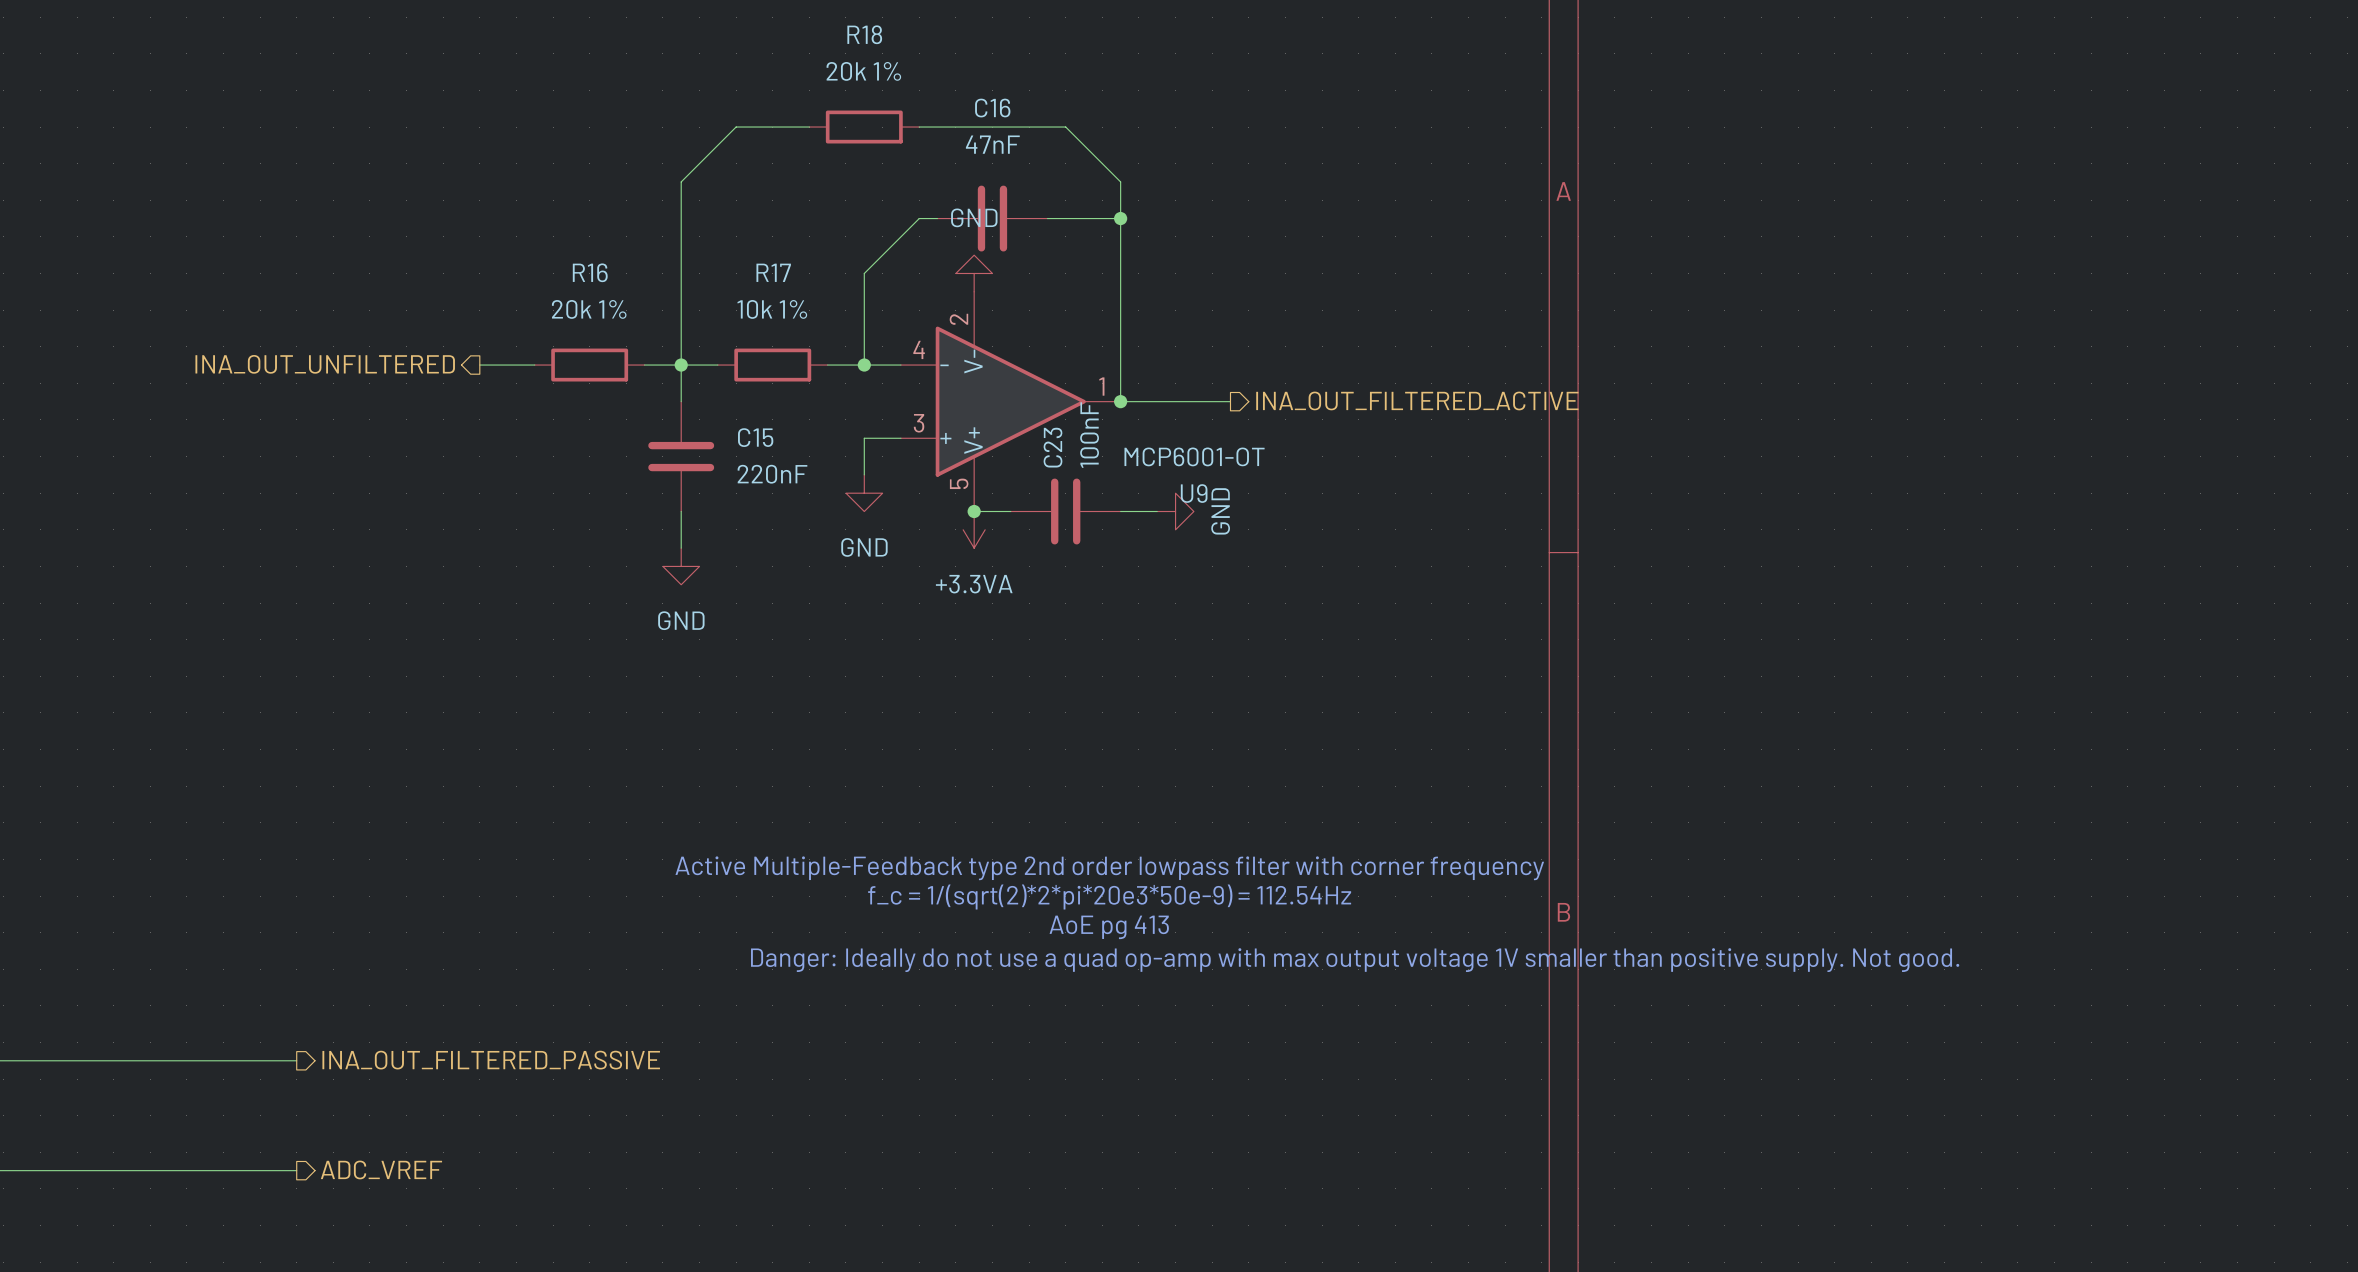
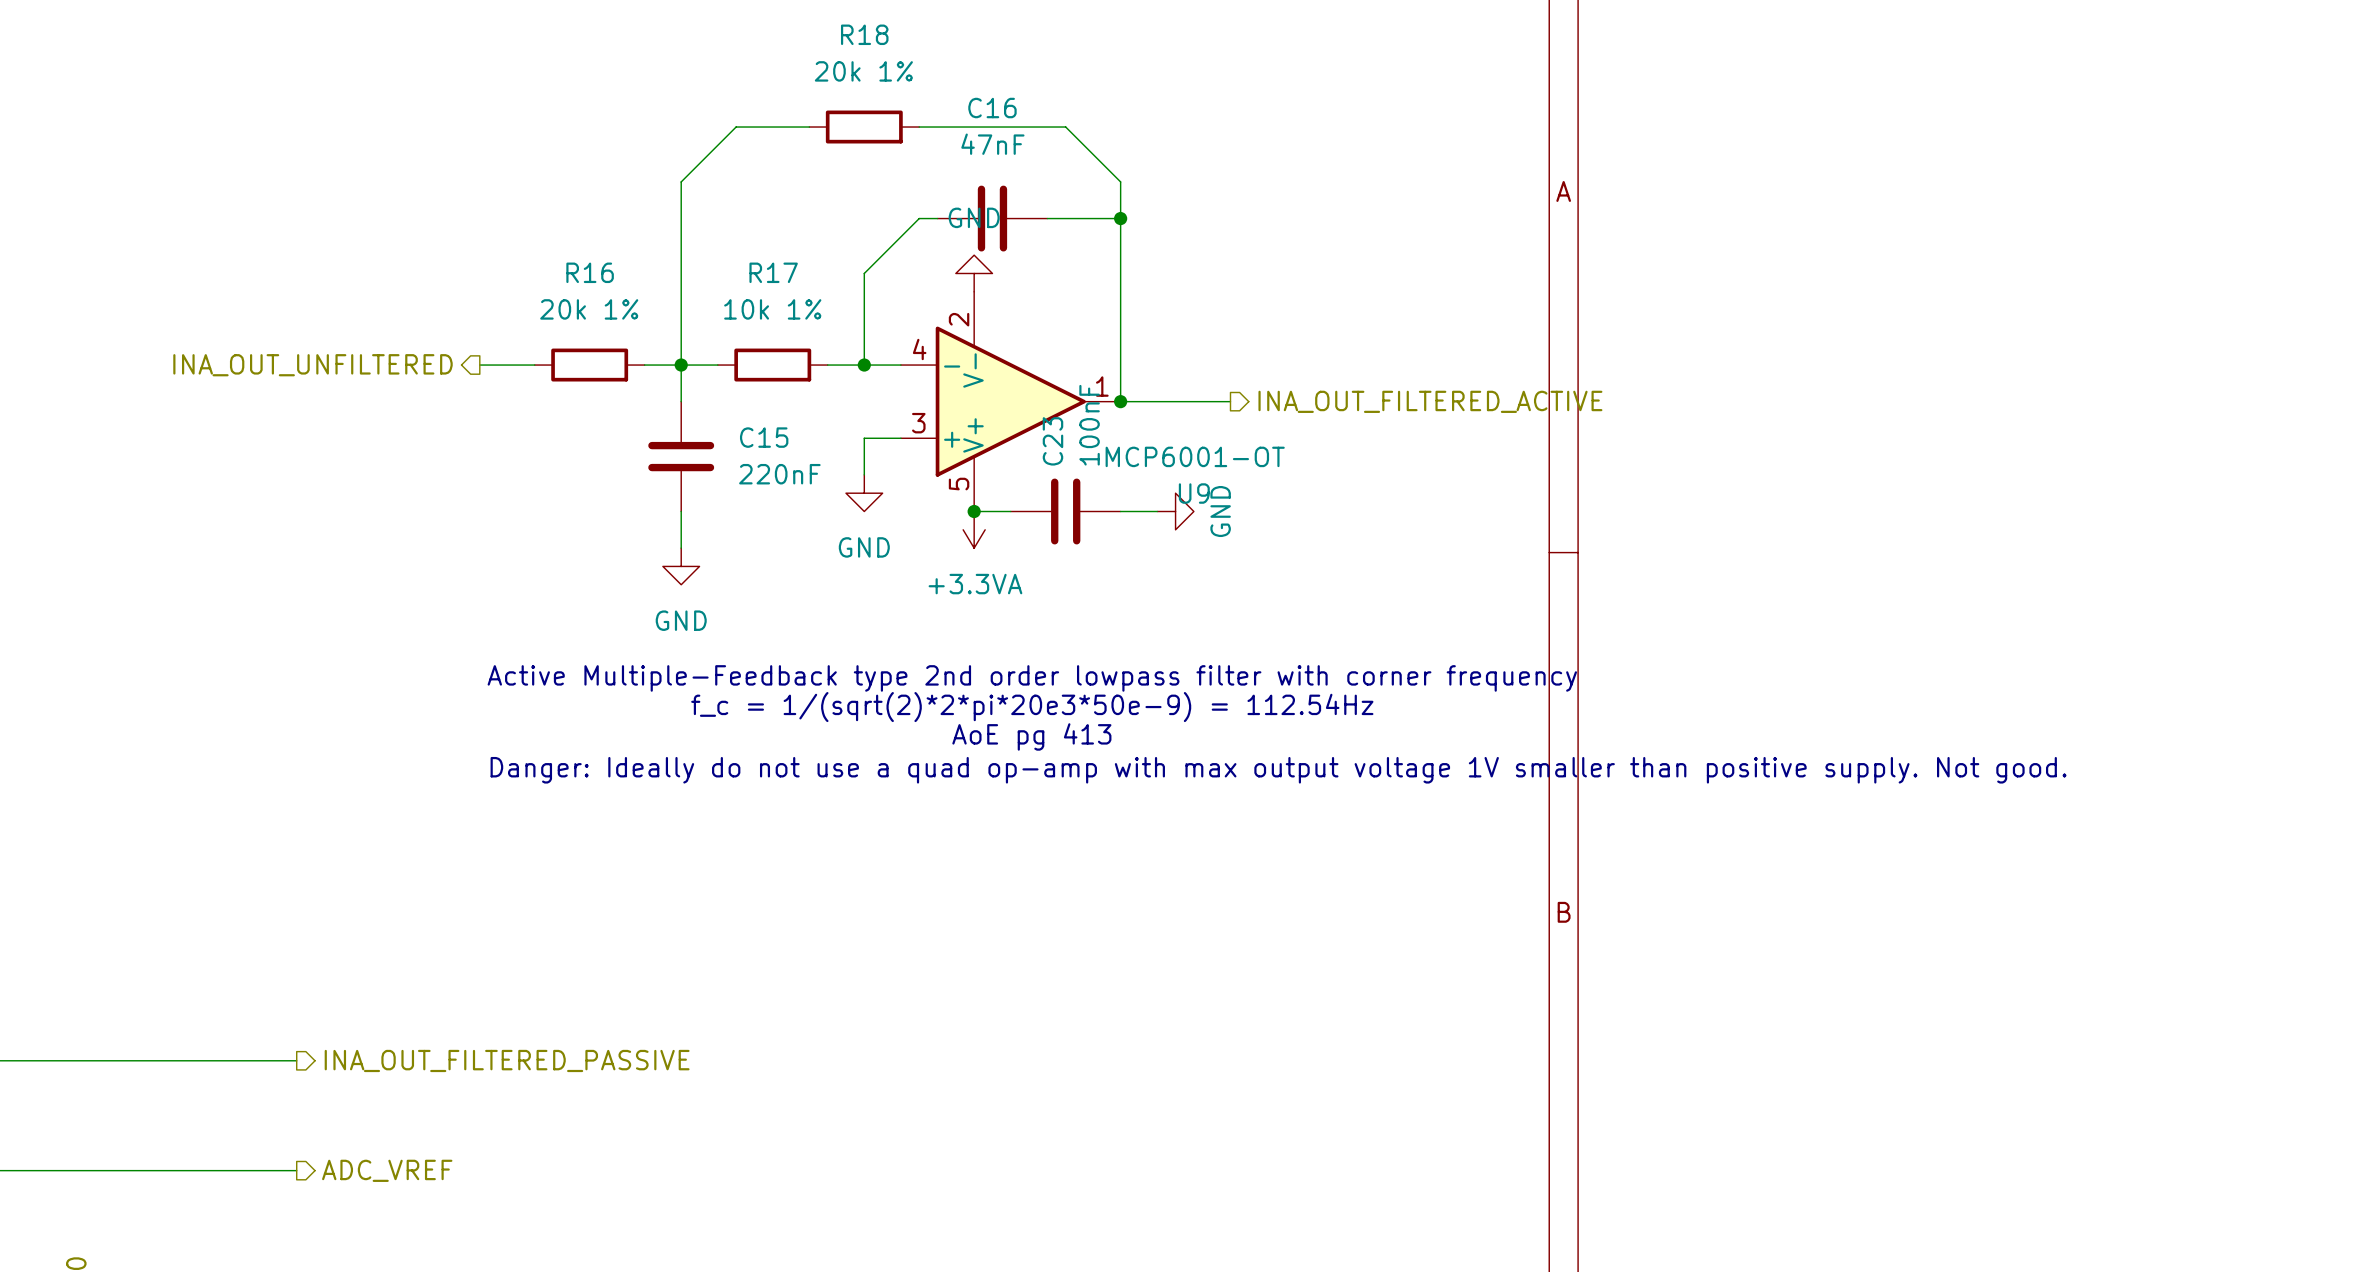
text position: Active Multiple-Feedback type 2nd order lowpass filter with corner frequency (1109, 868) -> Active Multiple-Feedback type 2nd order lowpass filter with corner frequency (1032, 678)
text position: f_c = 1/(sqrt(2)*2*pi*20e3*50e-9) = 112.54Hz (1109, 896) -> f_c = 1/(sqrt(2)*2*pi*20e3*50e-9) = 112.54Hz (1032, 707)
text position: AoE pg 413 (1109, 927) -> AoE pg 413 (1031, 736)
text position: Danger: Ideally do not use a quad op-amp with max output voltage 1V smaller than positive supply. Not good. (1355, 960) -> Danger: Ideally do not use a quad op-amp with max output voltage 1V smaller than positive supply. Not good. (1278, 770)

